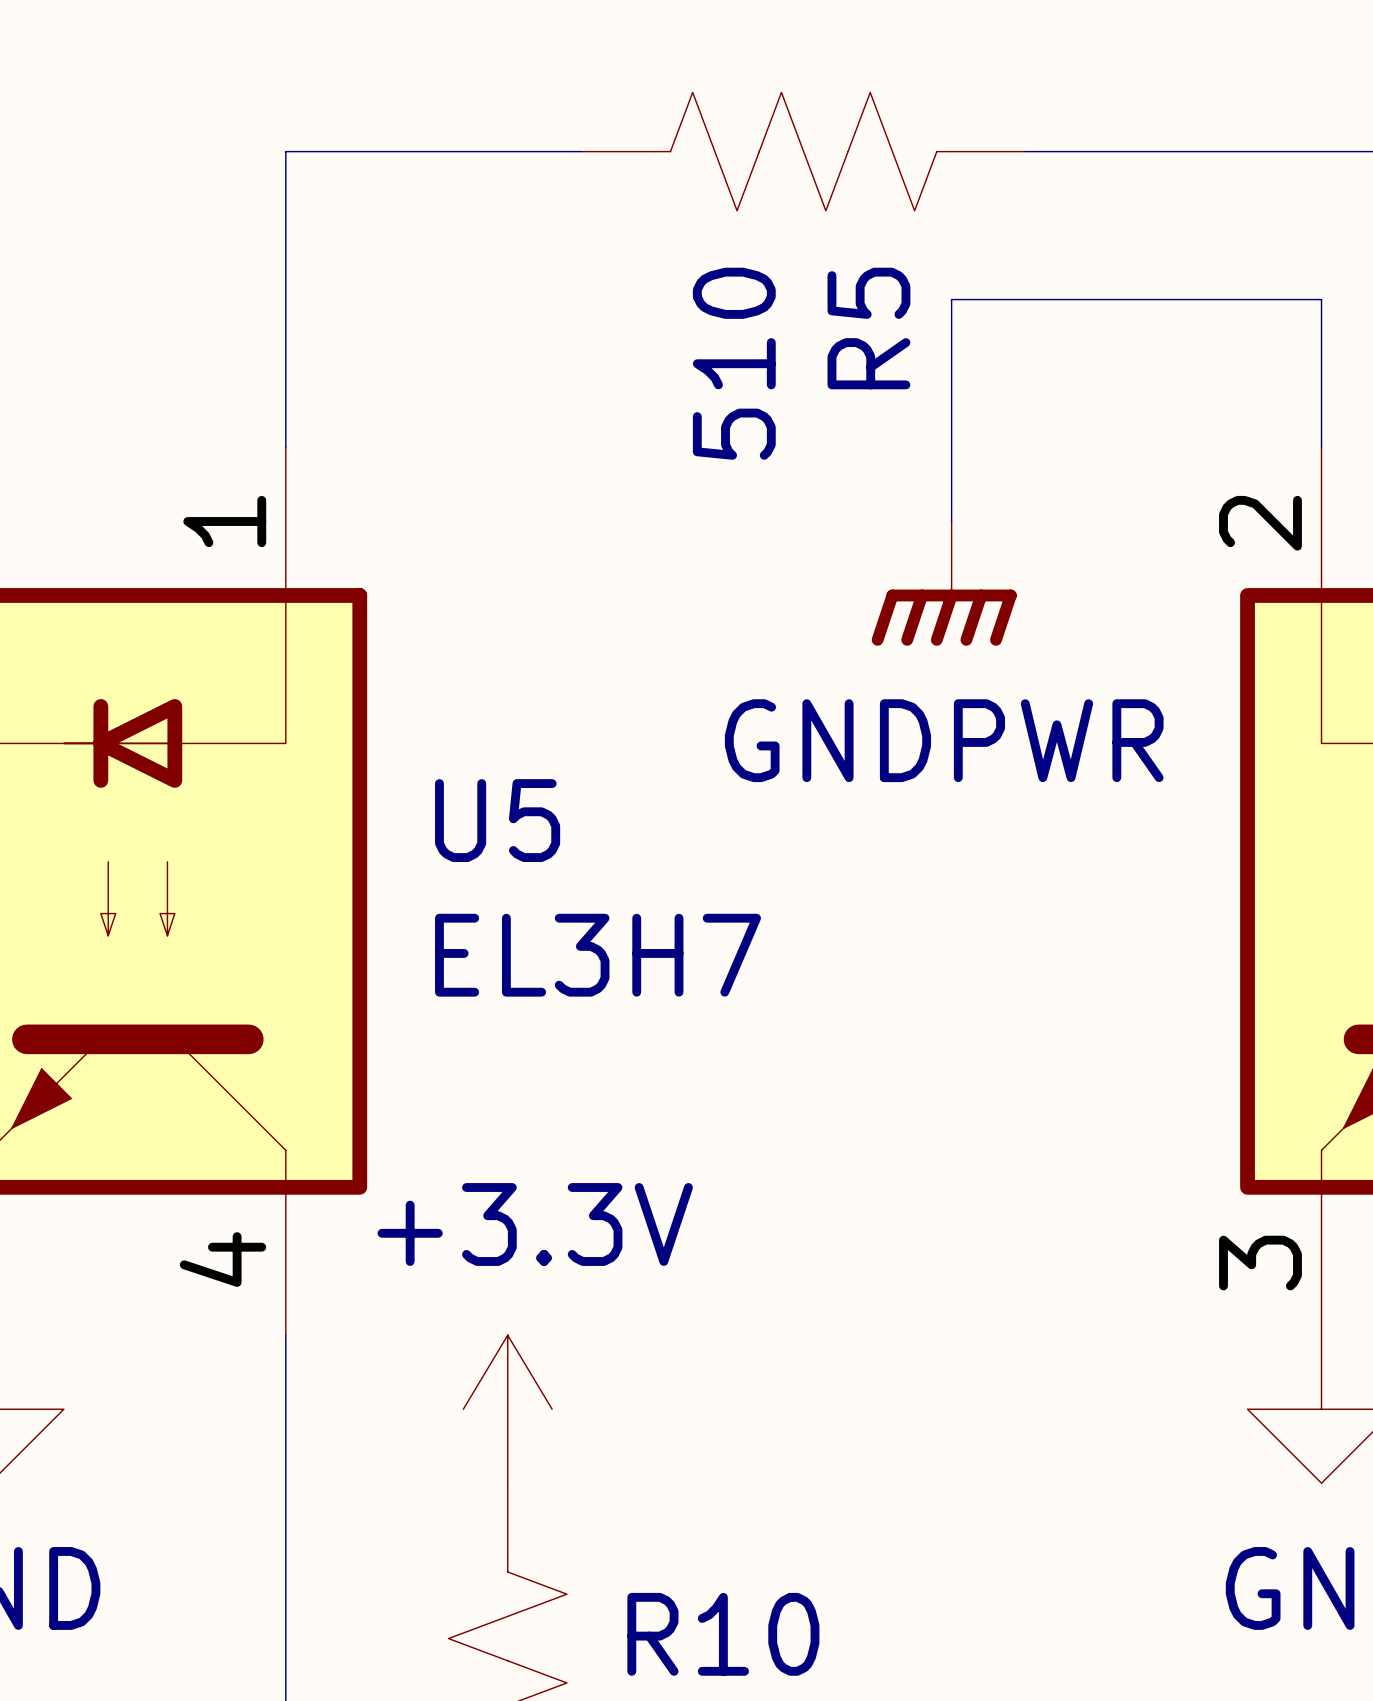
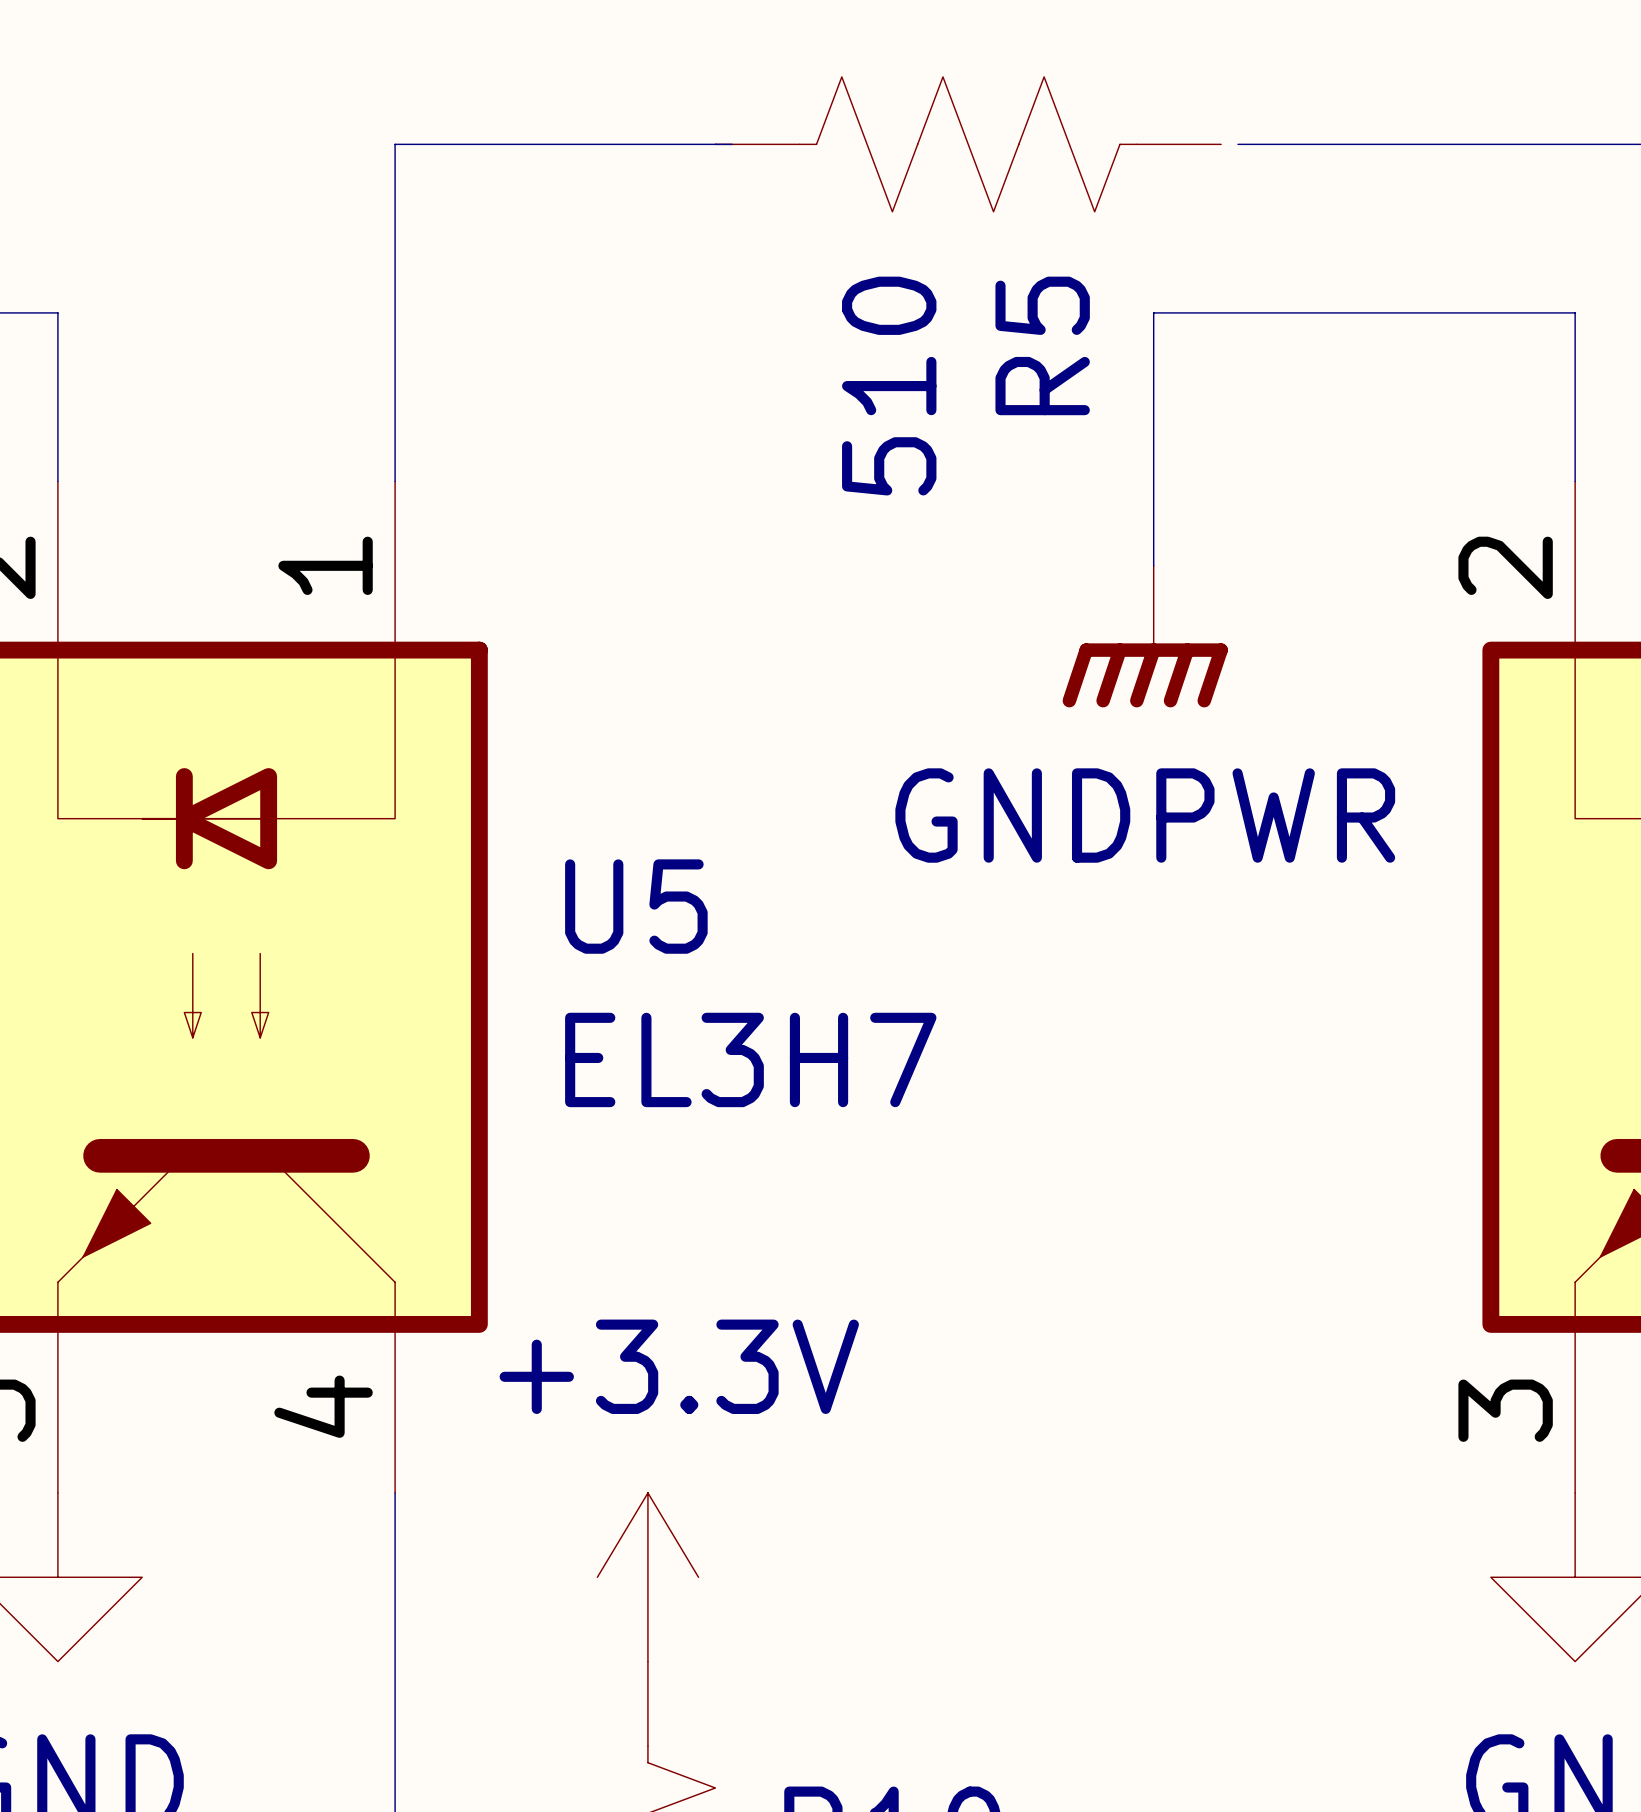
R5 position: (803, 151) -> (968, 144)

